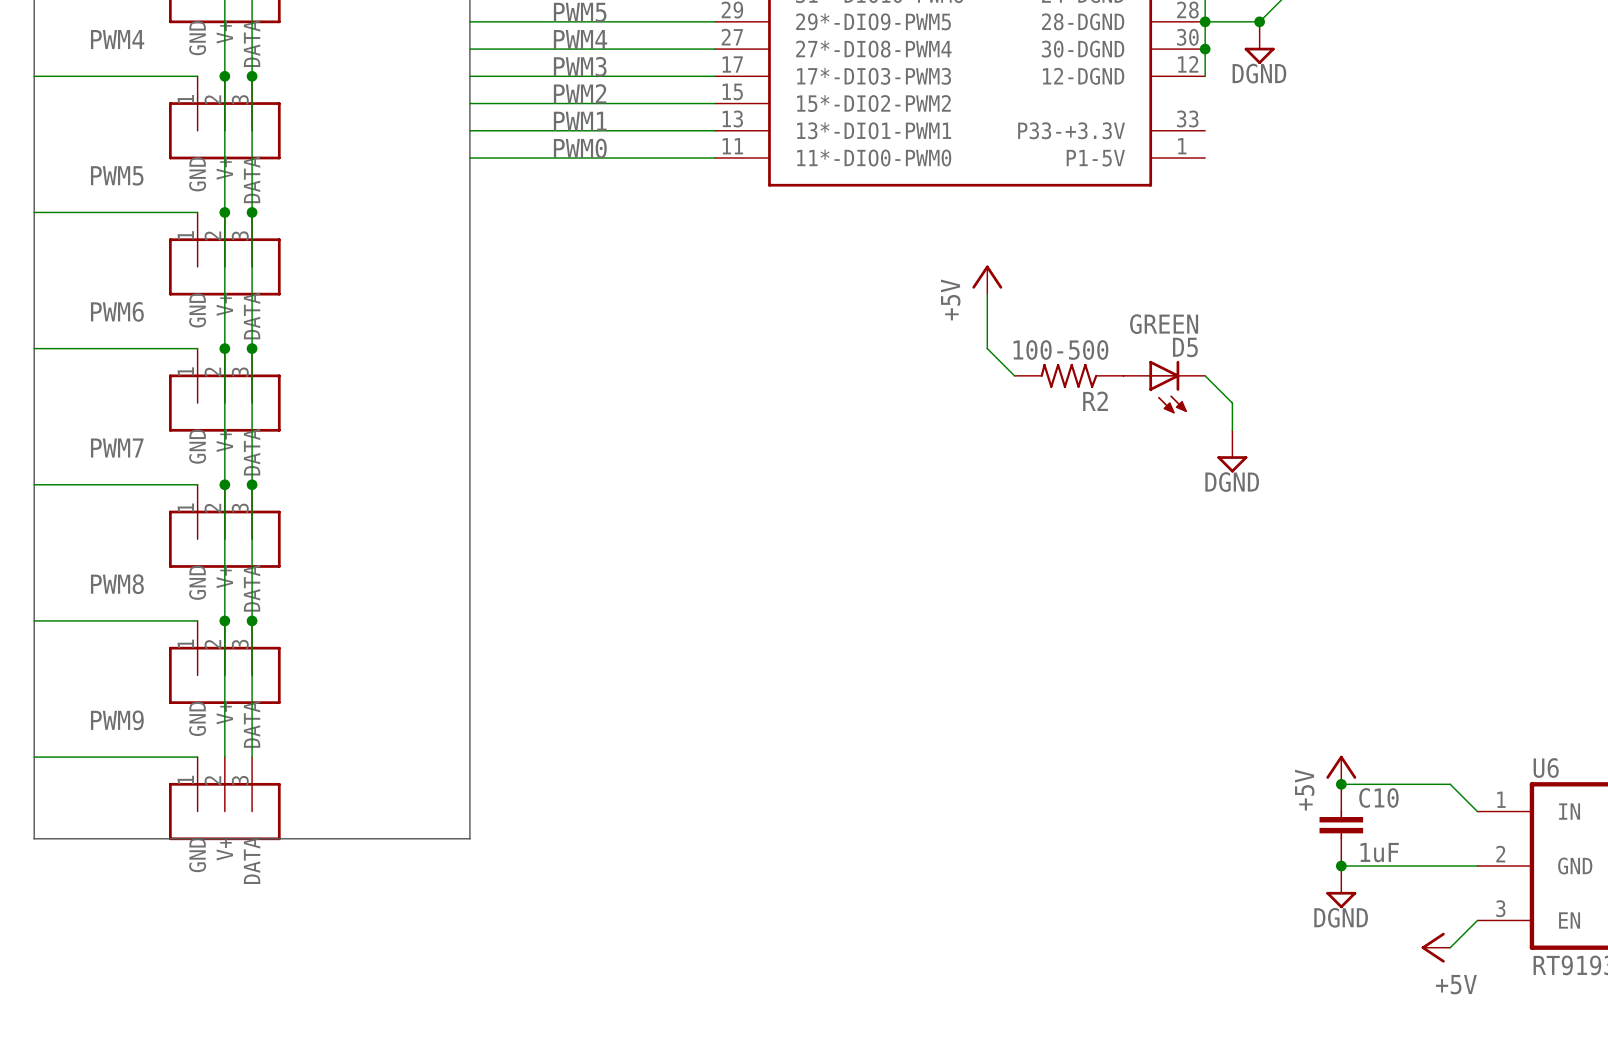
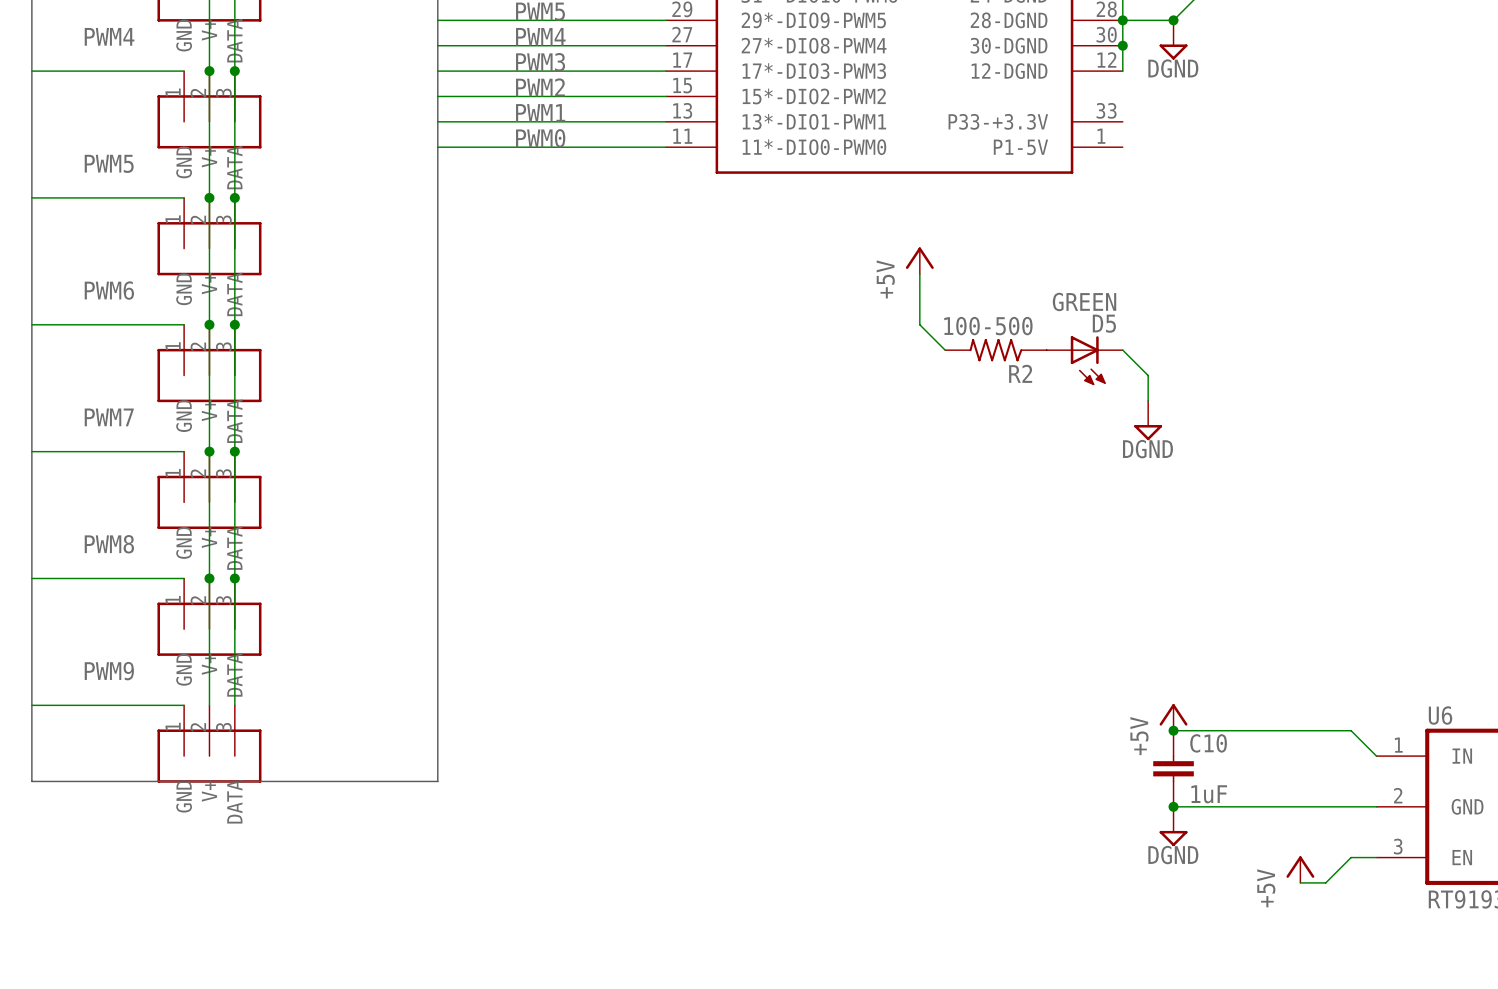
power symbol position: +5V (1341, 770) -> +5V (1173, 717)
wire: none -> (1173, 730) (1249, 730)
junction: none -> (1173, 730)
junction: (1341, 784) -> none
C10 position: (1341, 825) -> (1173, 768)
wire: none -> (1173, 806) (1249, 806)
junction: none -> (1173, 806)
junction: (1341, 866) -> none
power symbol position: DGND (1341, 887) -> DGND (1173, 826)
wire: (1477, 920) (1450, 947) -> (1376, 857) (1351, 857) (1325, 882) (1300, 882)
power symbol rotation: 0° (1433, 947) -> 90° clockwise (1300, 867)
power symbol position: +5V (1435, 947) -> +5V (1300, 869)

